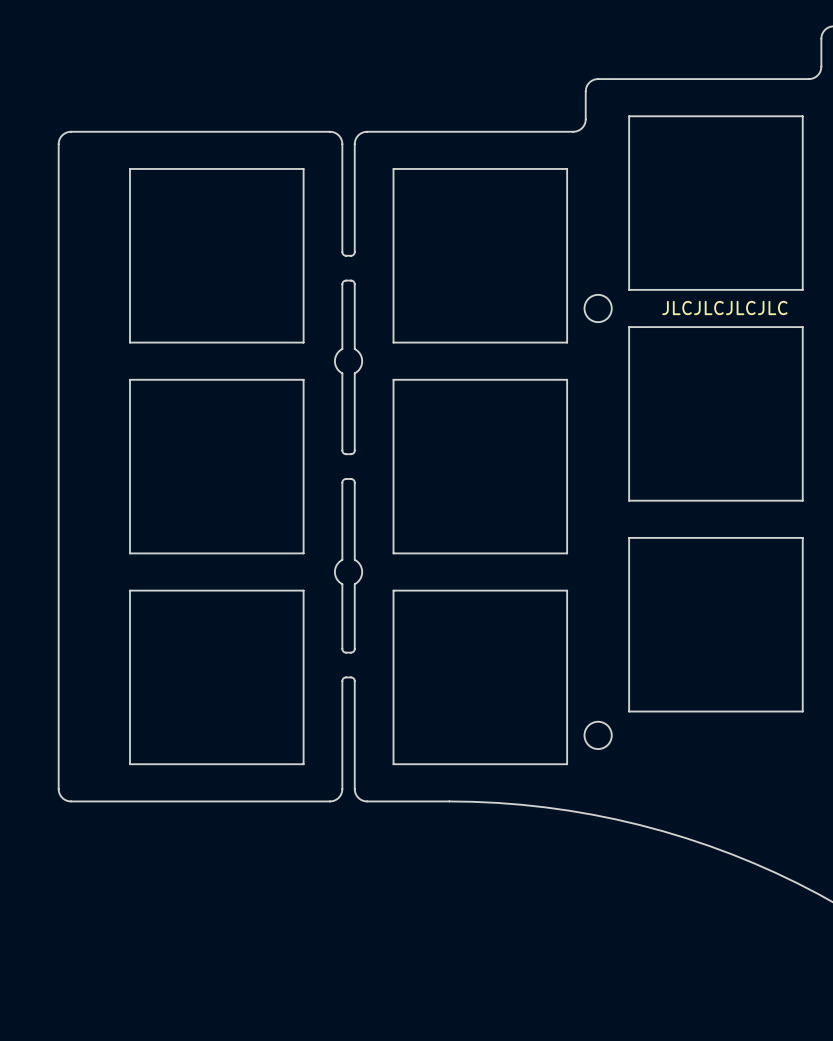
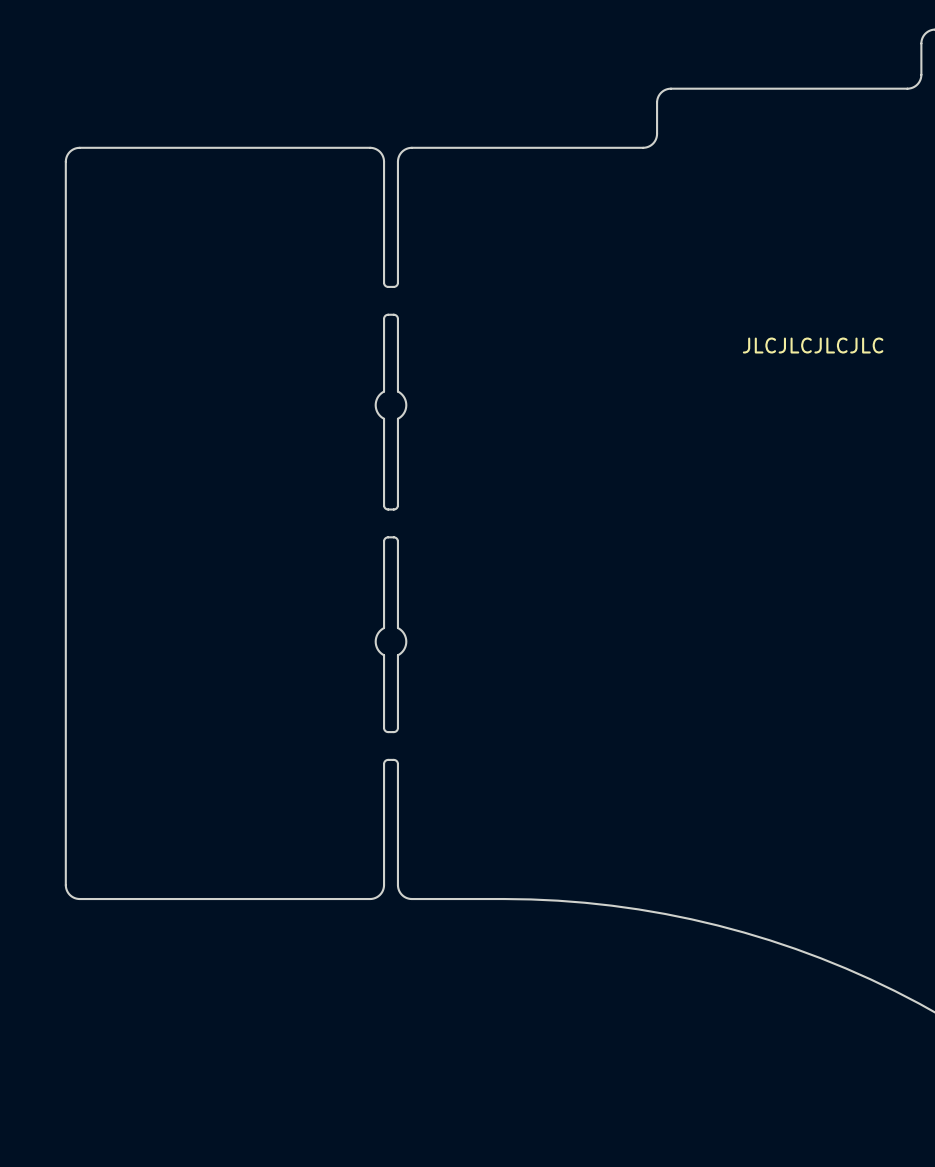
board edge: (629, 116) (629, 289) (802, 289) (802, 116) (629, 116) -> none
board edge: (129, 168) (129, 342) (303, 342) (303, 168) (129, 168) -> none
board edge: (393, 168) (567, 168) (567, 342) (393, 342) (393, 168) -> none
round board edge: [583, 293, 613, 324] -> none
board edge: (629, 327) (629, 500) (802, 500) (802, 327) (629, 327) -> none
board edge: (129, 379) (129, 553) (303, 553) (303, 379) (129, 379) -> none
board edge: (393, 379) (567, 379) (567, 553) (393, 553) (393, 379) -> none
board edge: (629, 537) (802, 537) (802, 711) (629, 711) (629, 537) -> none
board edge: (129, 590) (303, 590) (303, 764) (129, 764) (129, 590) -> none
board edge: (393, 590) (567, 590) (567, 764) (393, 764) (393, 590) -> none
round board edge: [583, 720, 613, 750] -> none

